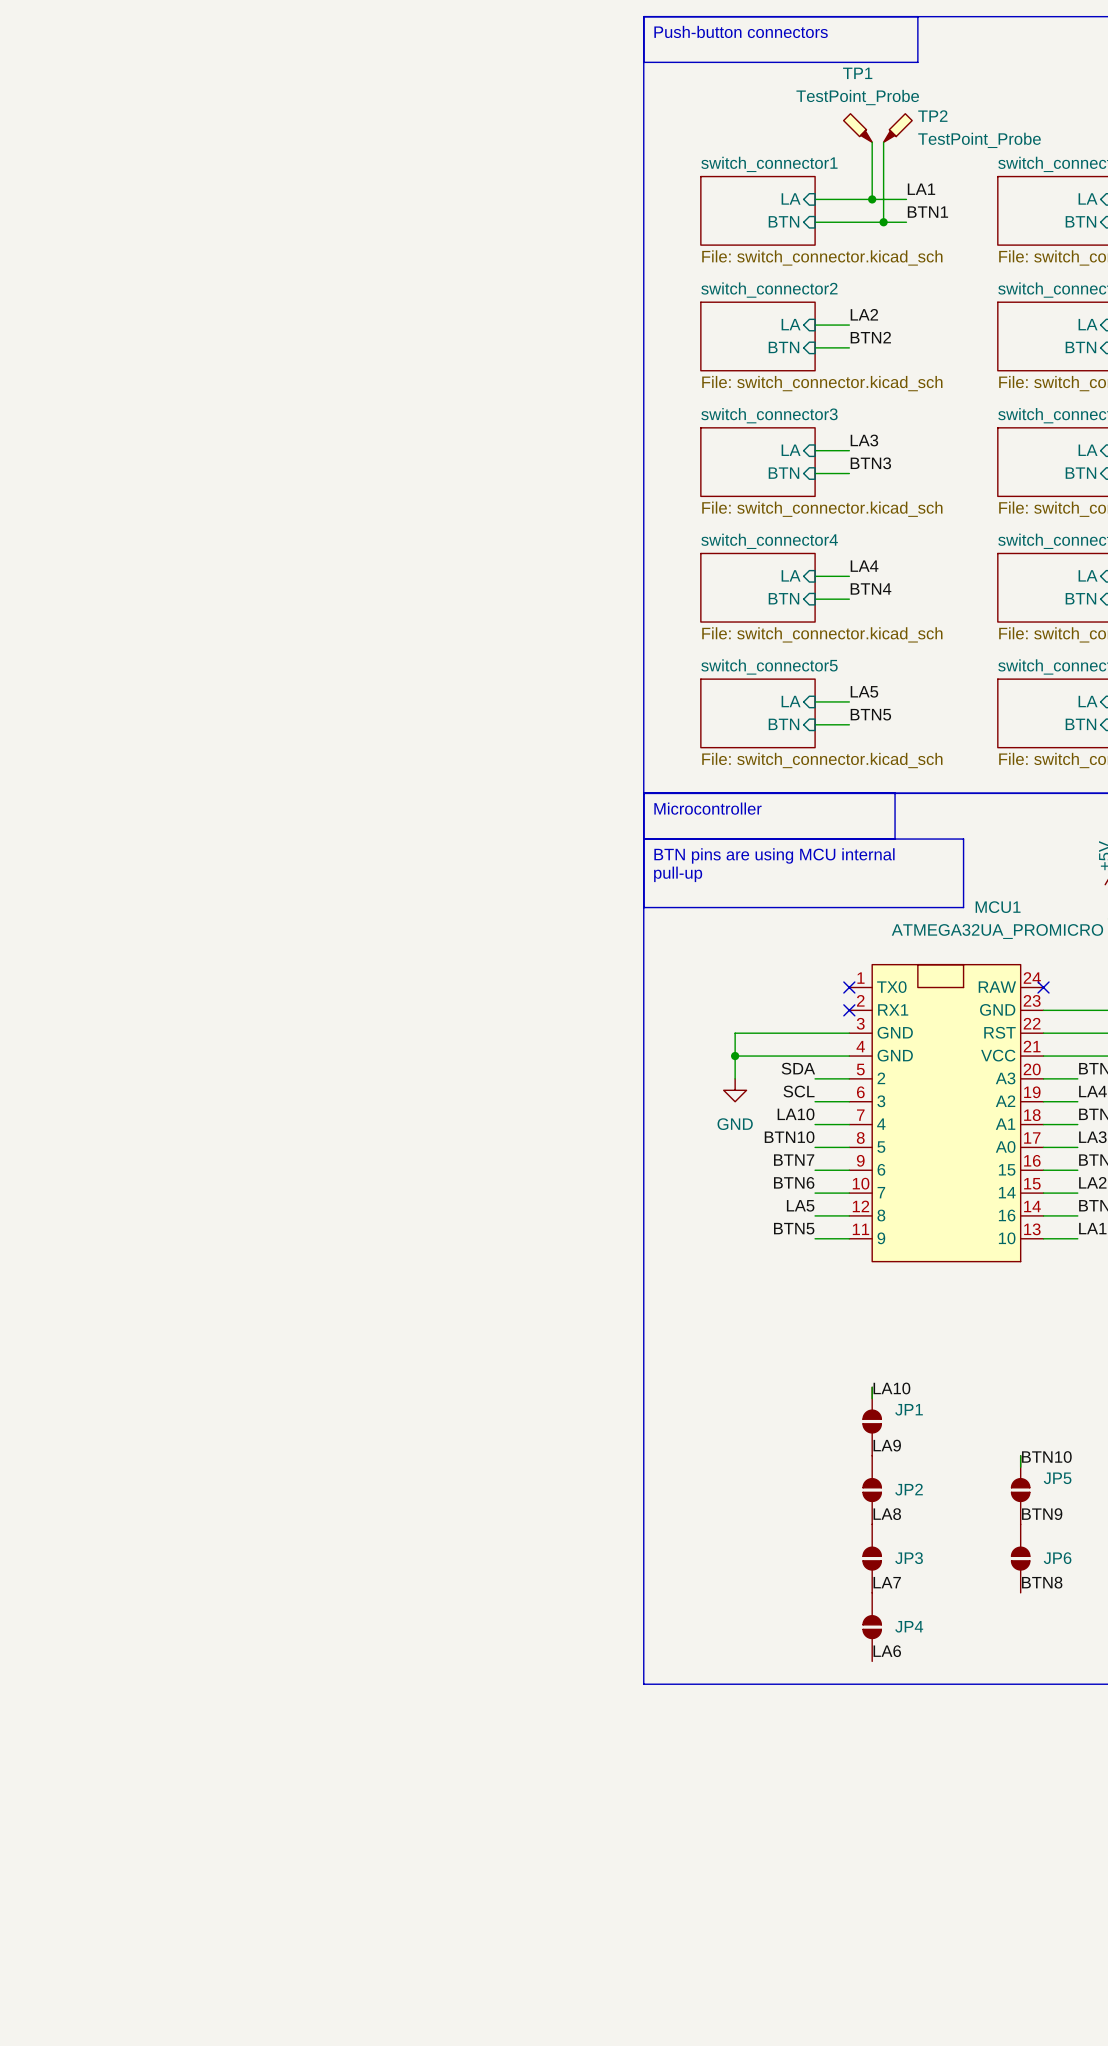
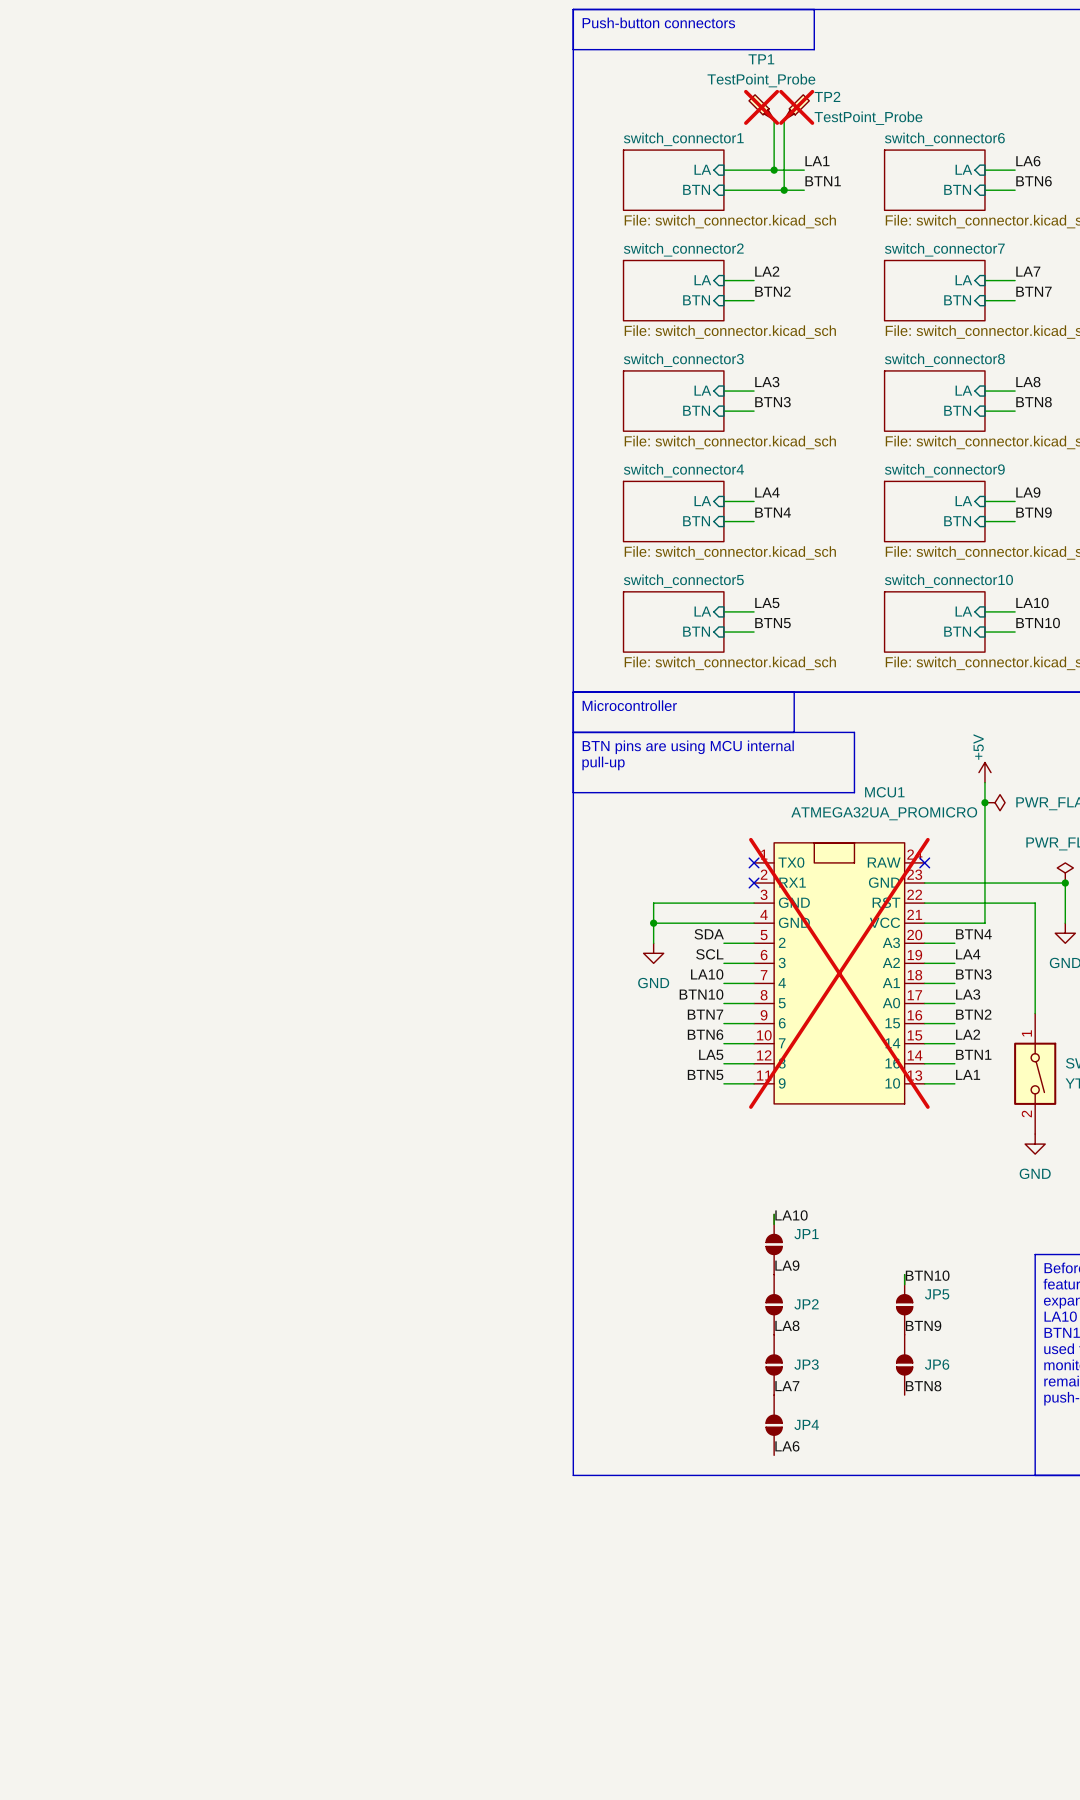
TP1 do-not-place cross: none -> (761, 107)
TP2 do-not-place cross: none -> (796, 107)
MCU1 do-not-place cross: none -> (839, 973)

